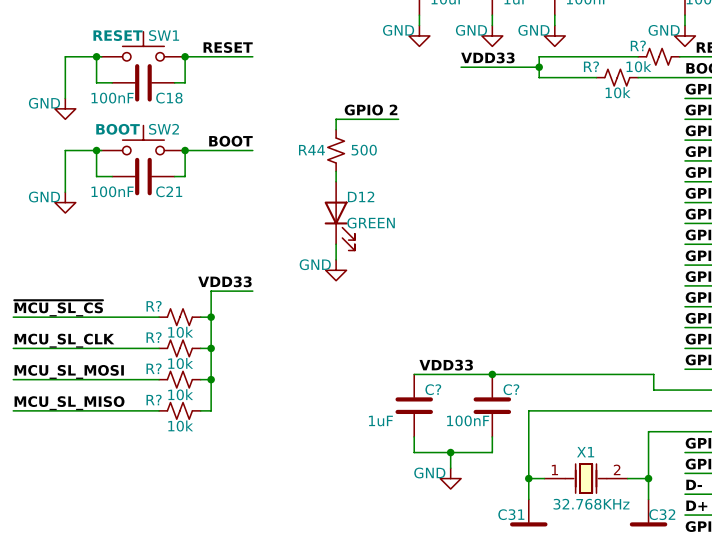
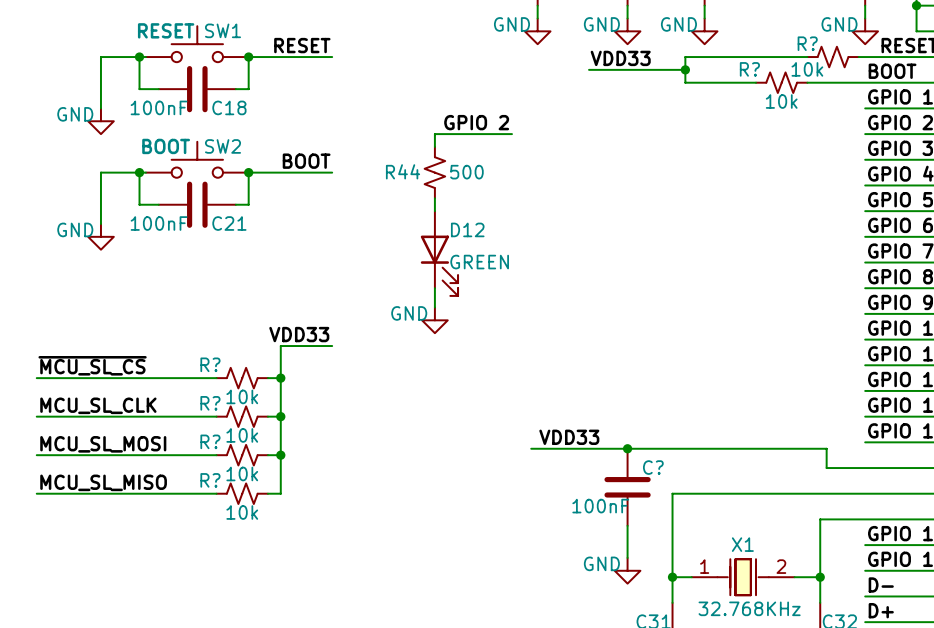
C?: 1uF (414, 405) -> none
wire: (414, 436) (414, 452) (492, 452) -> (627, 557) (627, 545)
wire: (450, 452) (450, 468) -> none
junction: (450, 452) -> none
power symbol position: GND (450, 478) -> GND (627, 570)

